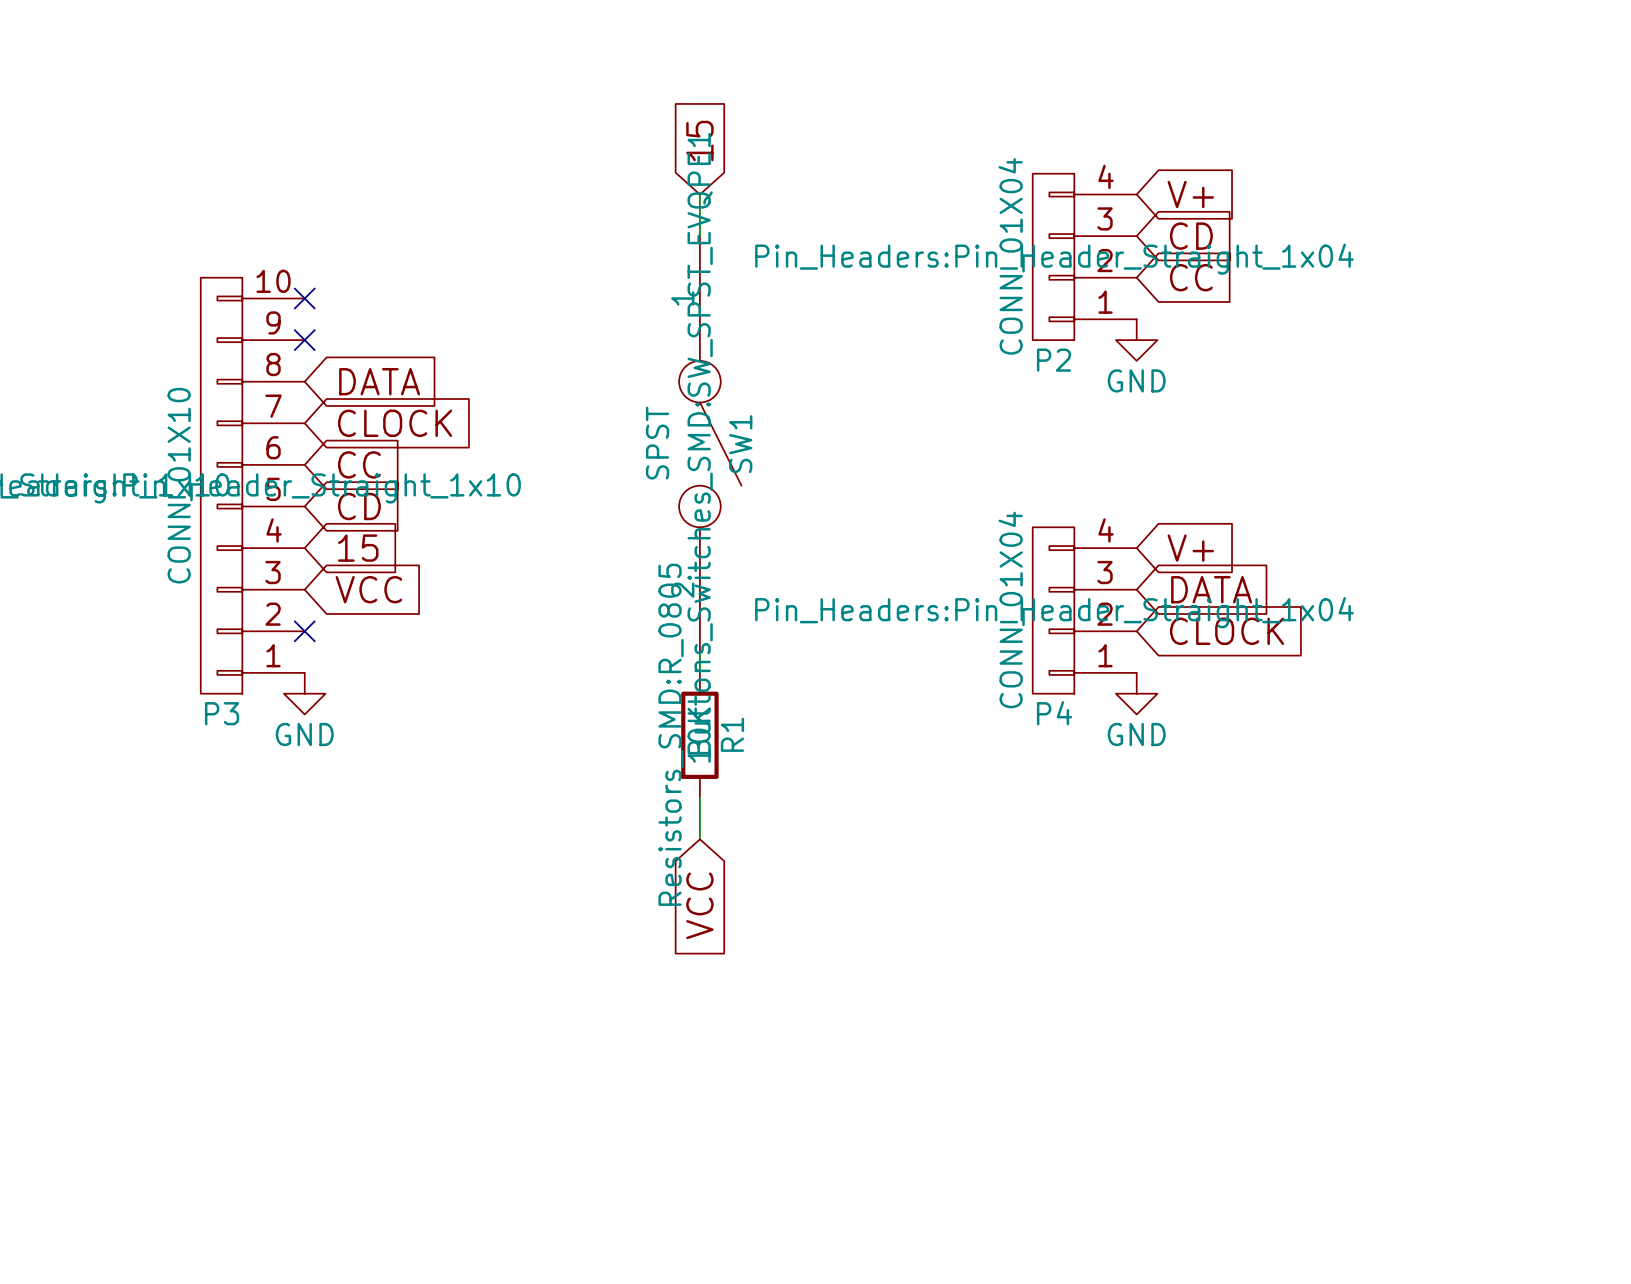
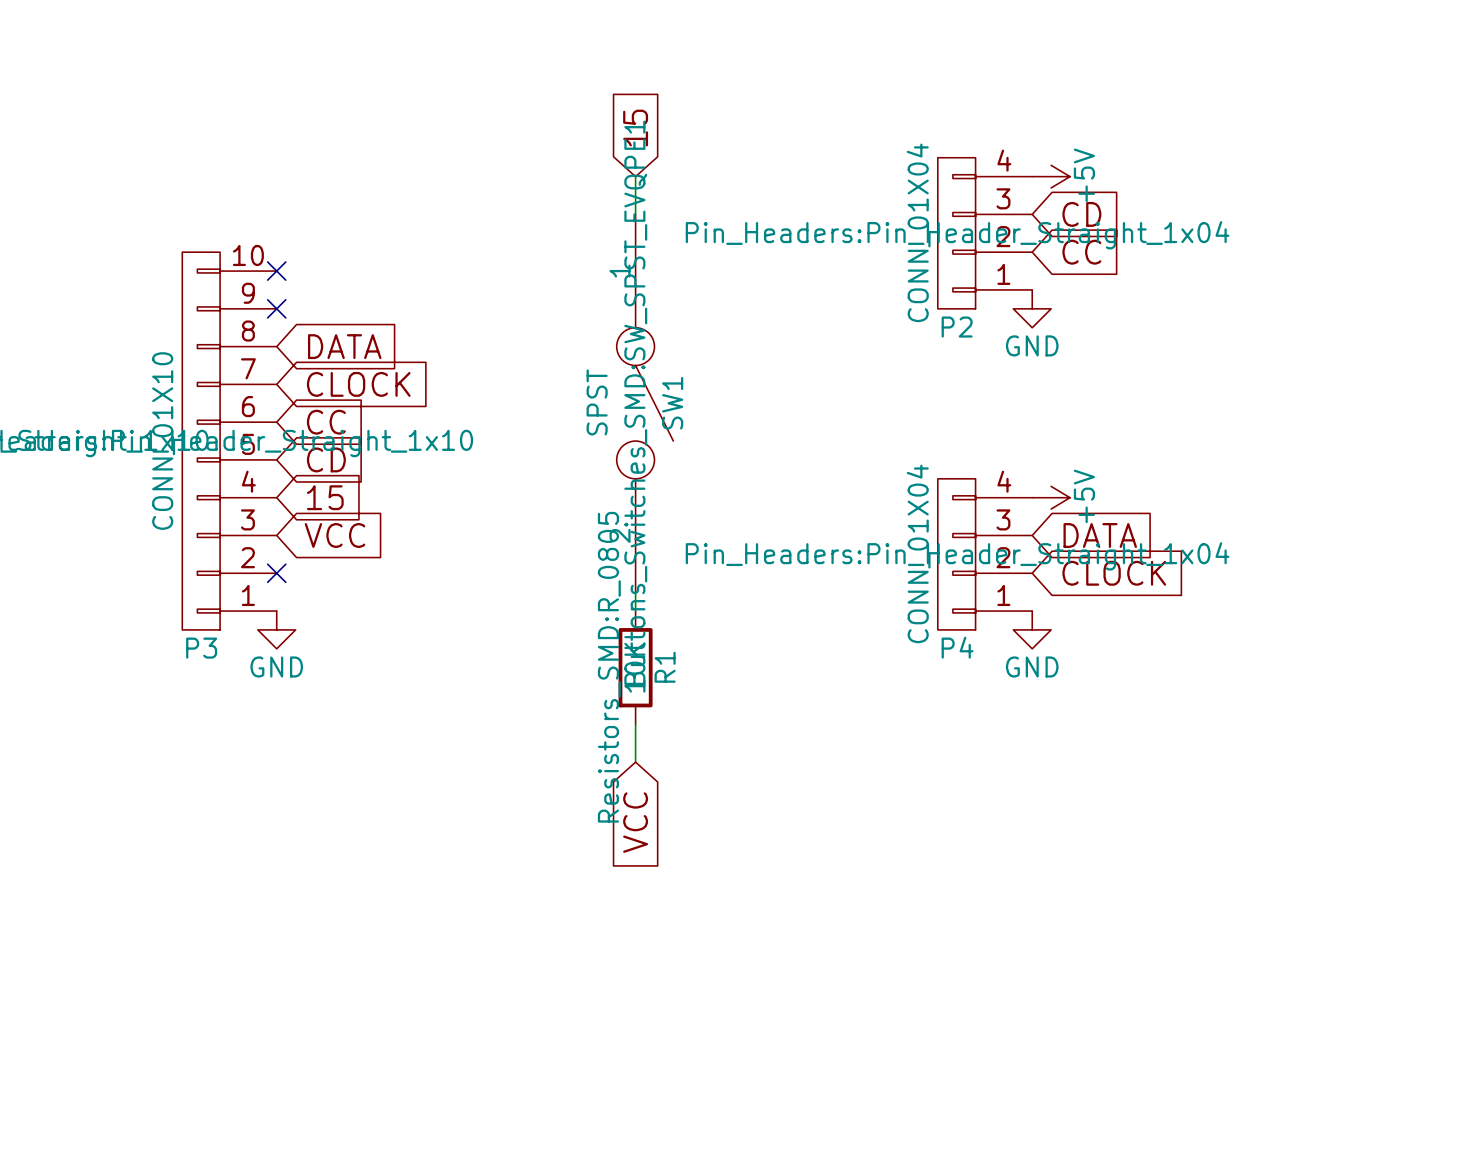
power symbol: none -> +5V (1051, 176)
global label: V+ (1190, 194) -> none
power symbol: none -> +5V (1051, 497)
global label: V+ (1190, 548) -> none

